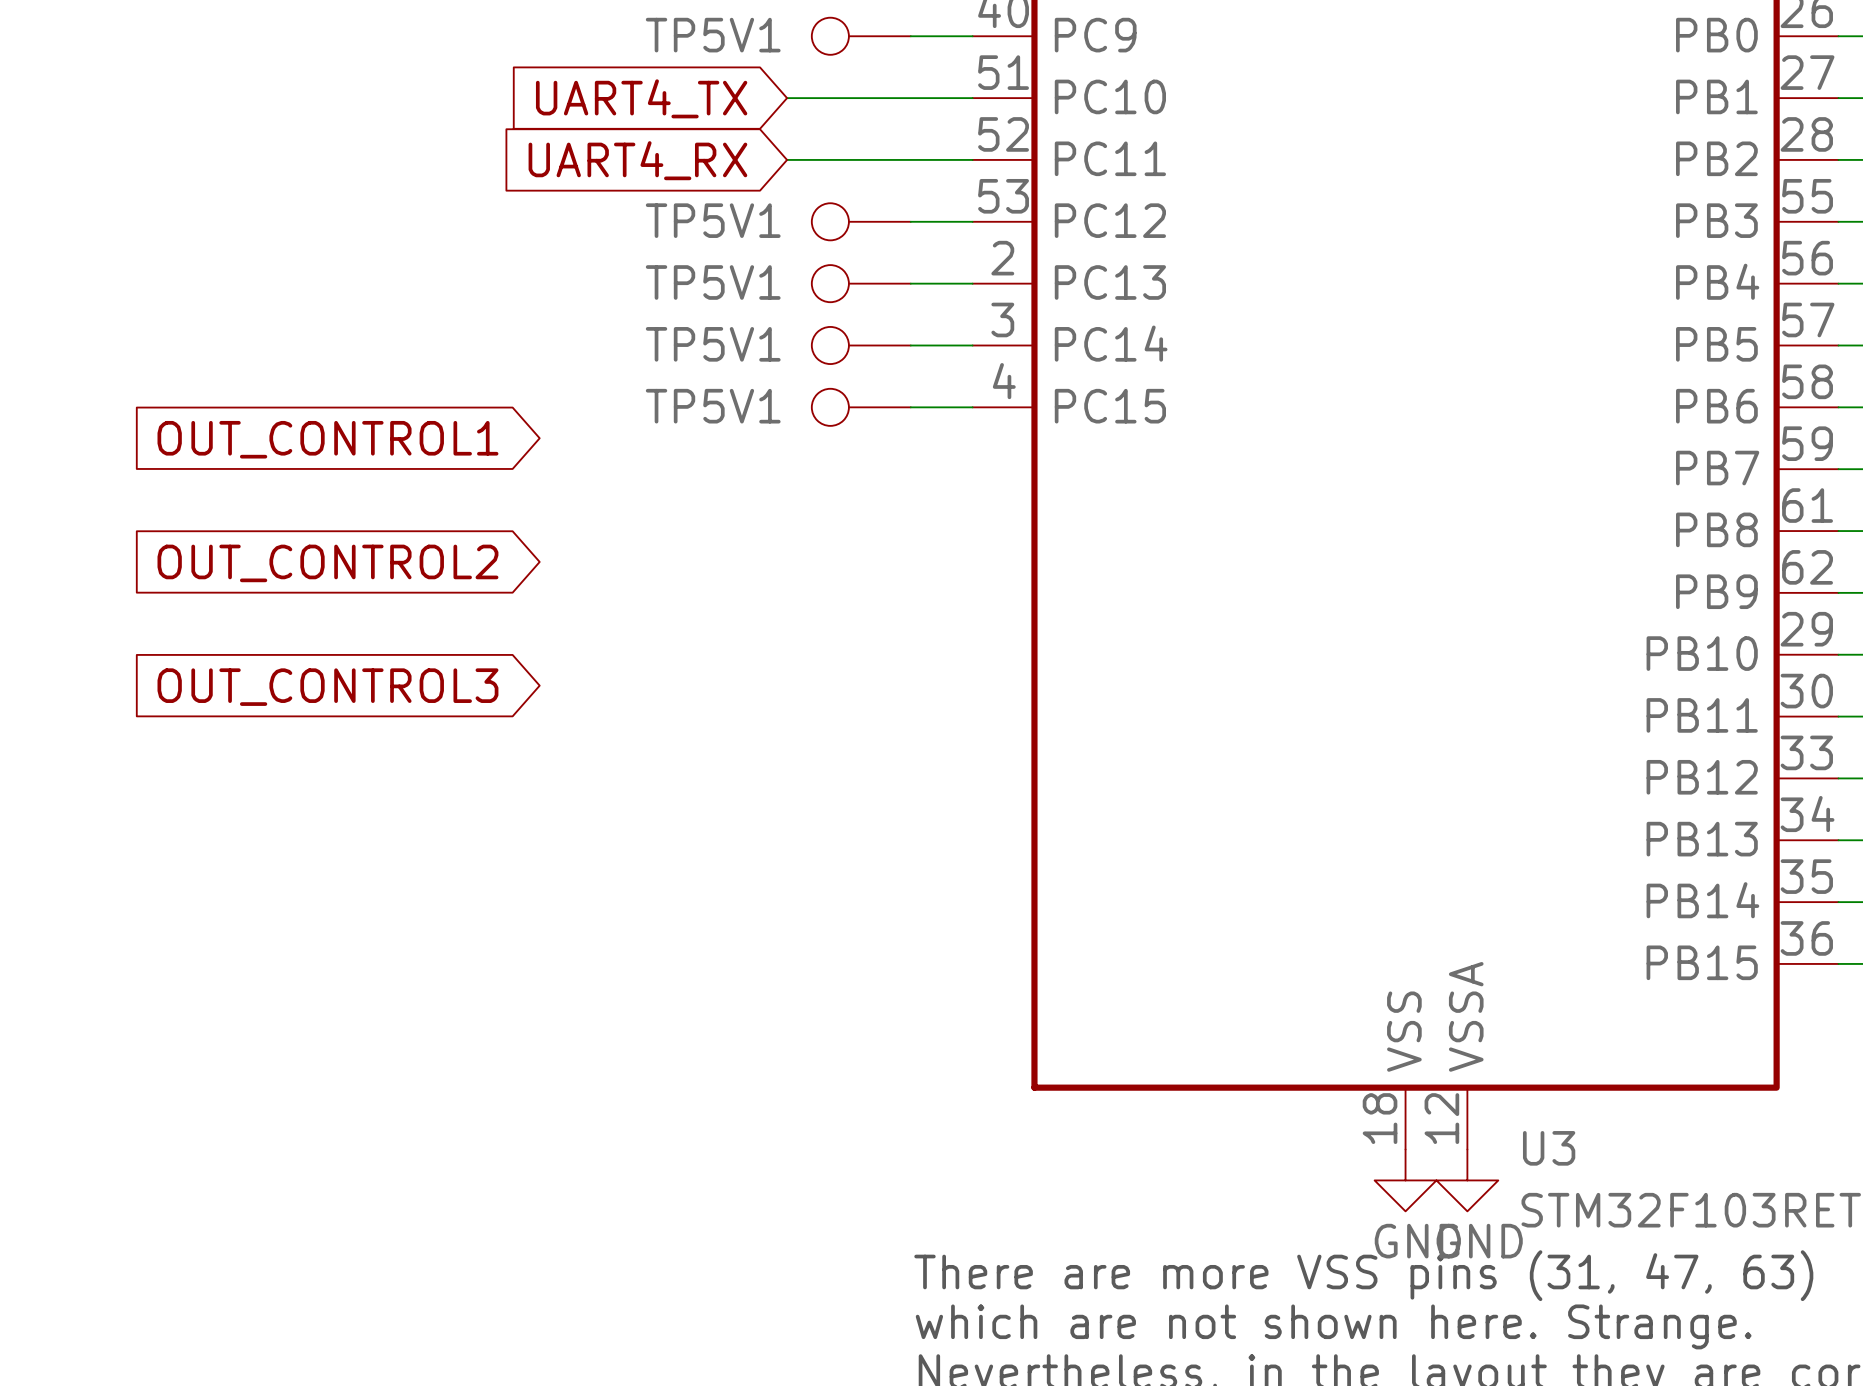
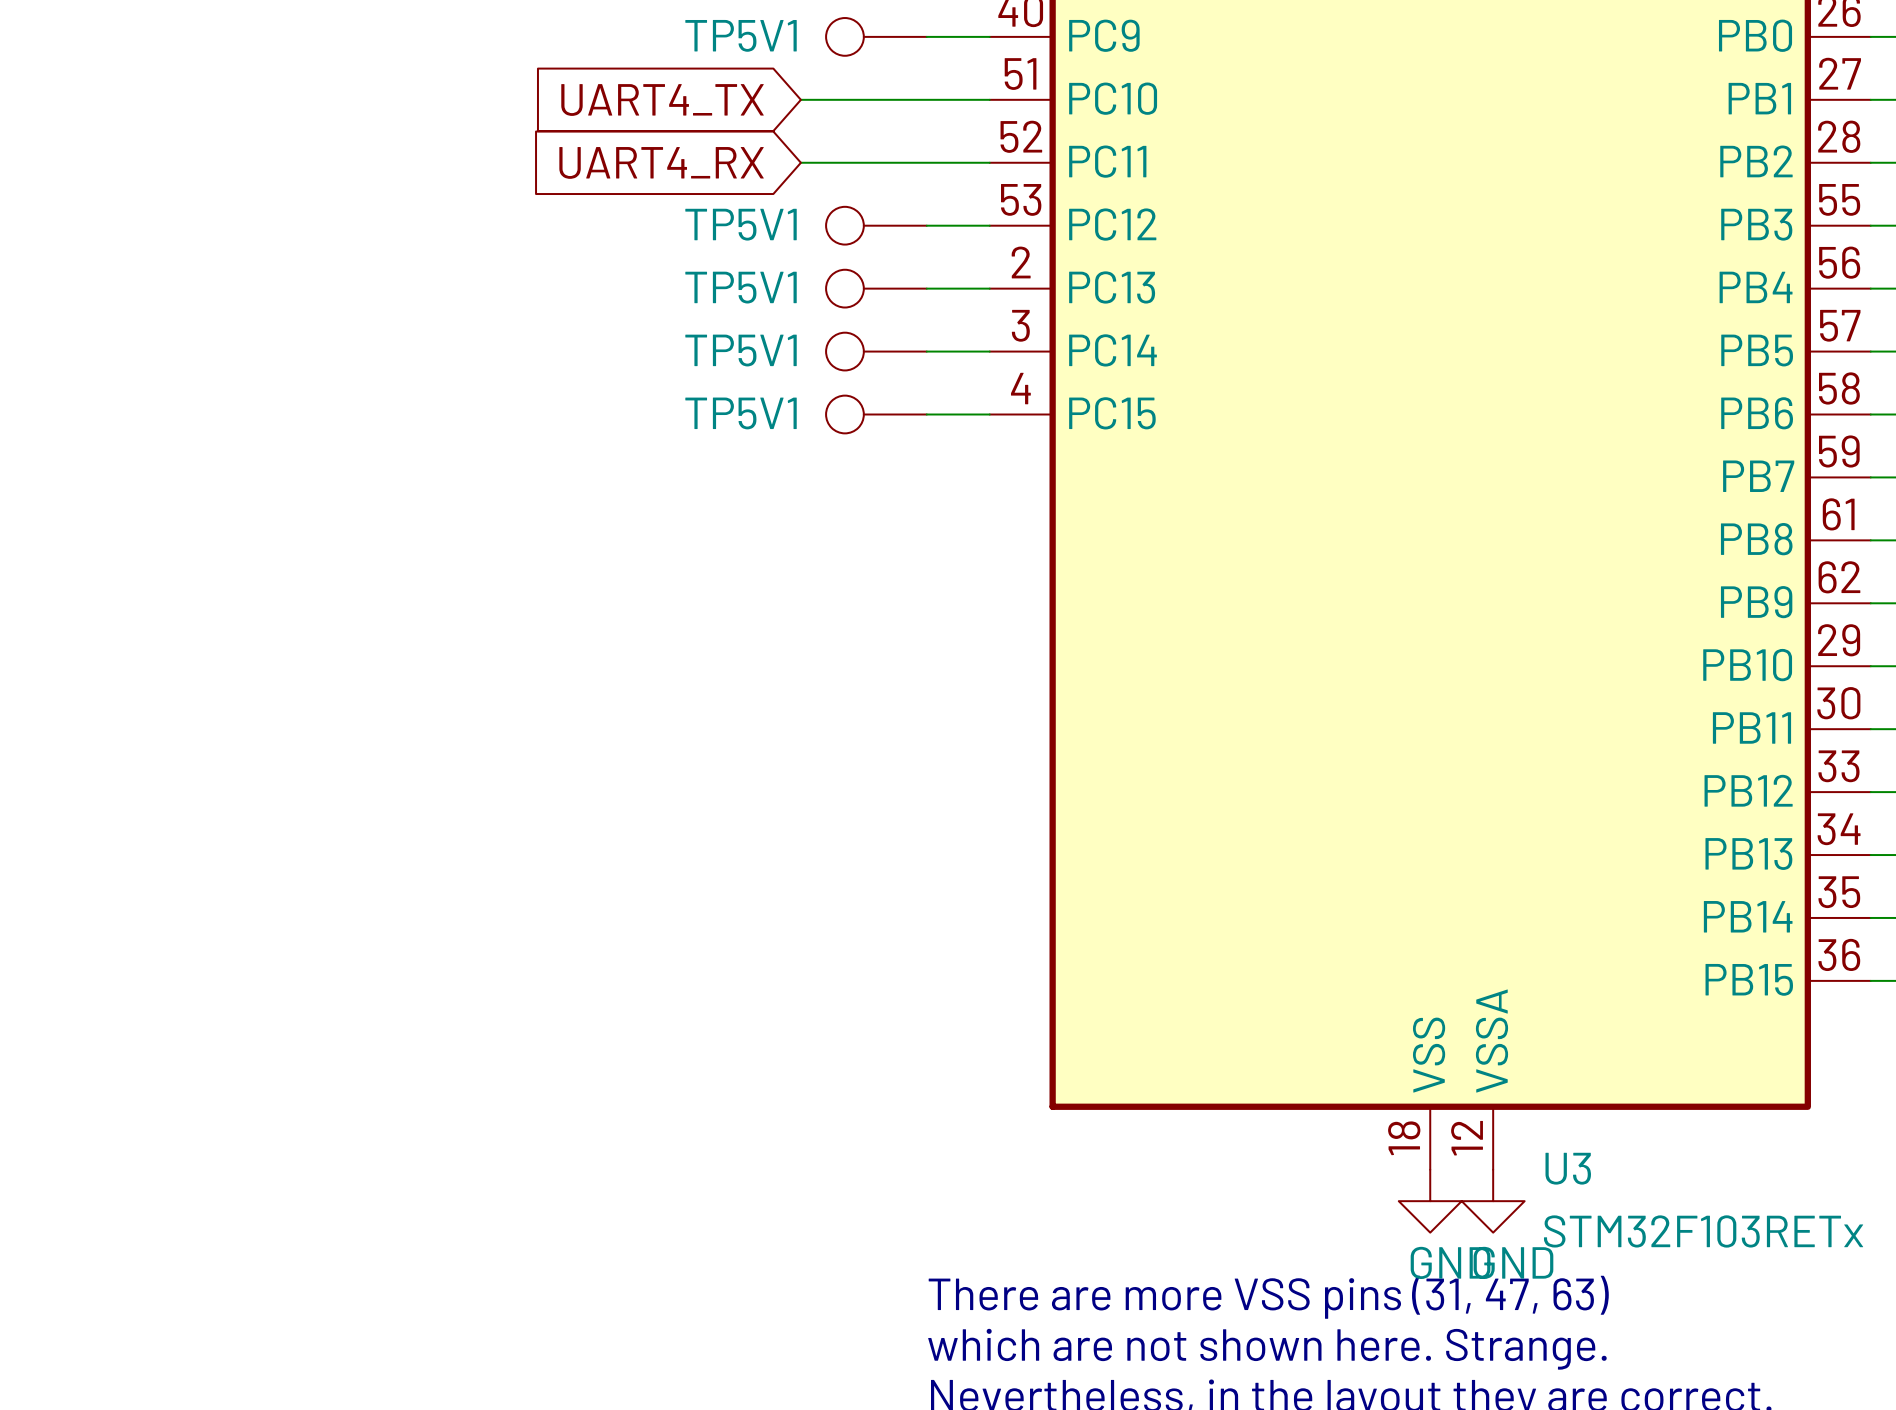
global label: OUT_CONTROL1 (327, 439) -> none
global label: OUT_CONTROL2 (327, 563) -> none
global label: OUT_CONTROL3 (327, 687) -> none

